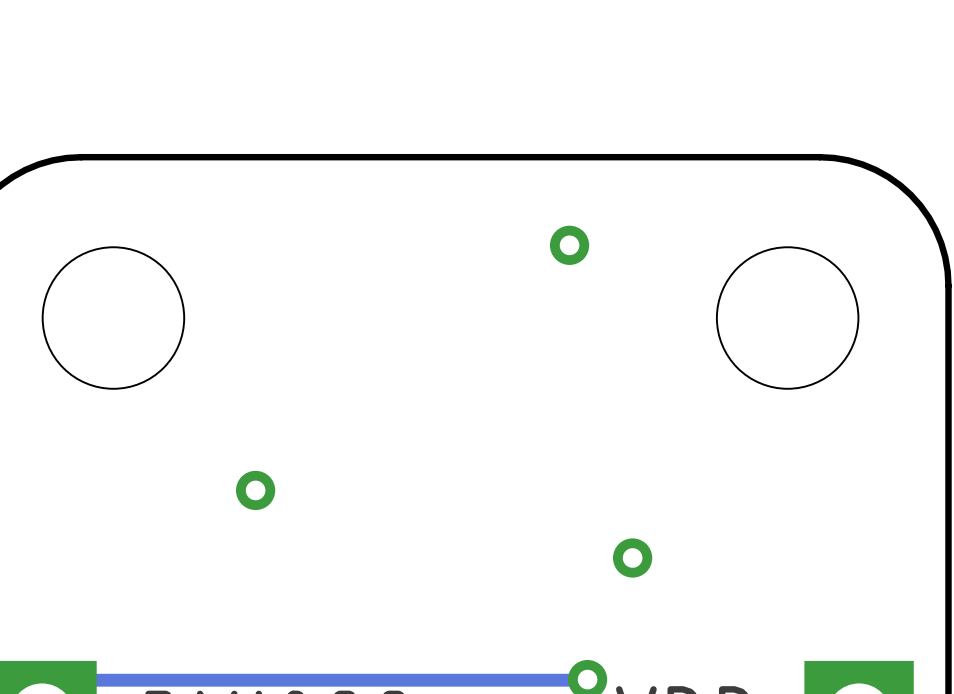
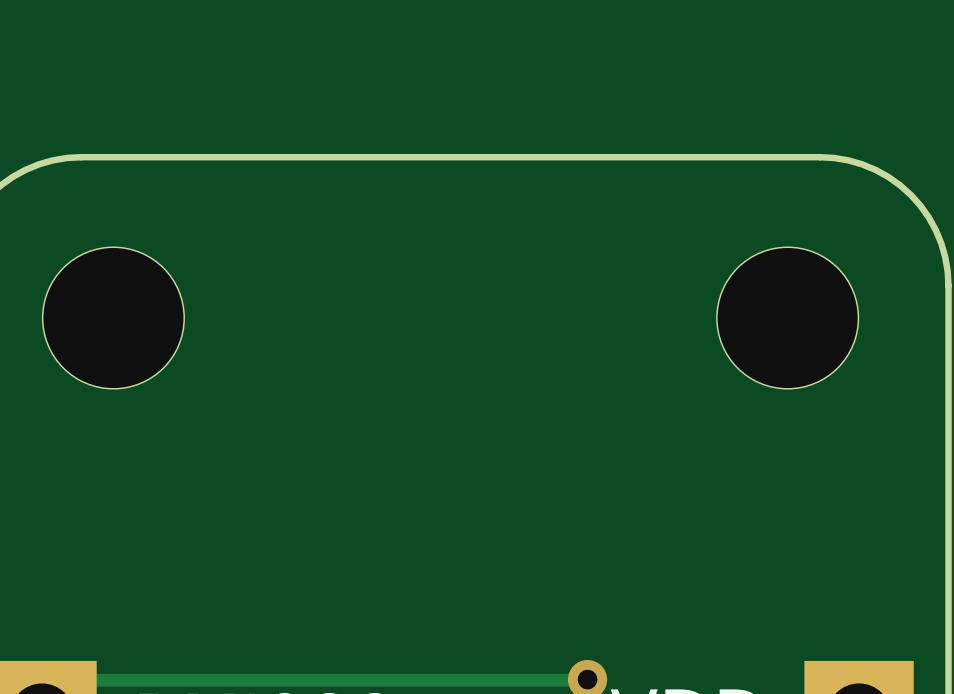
via: (569, 245) -> none
via: (255, 490) -> none
via: (632, 557) -> none

